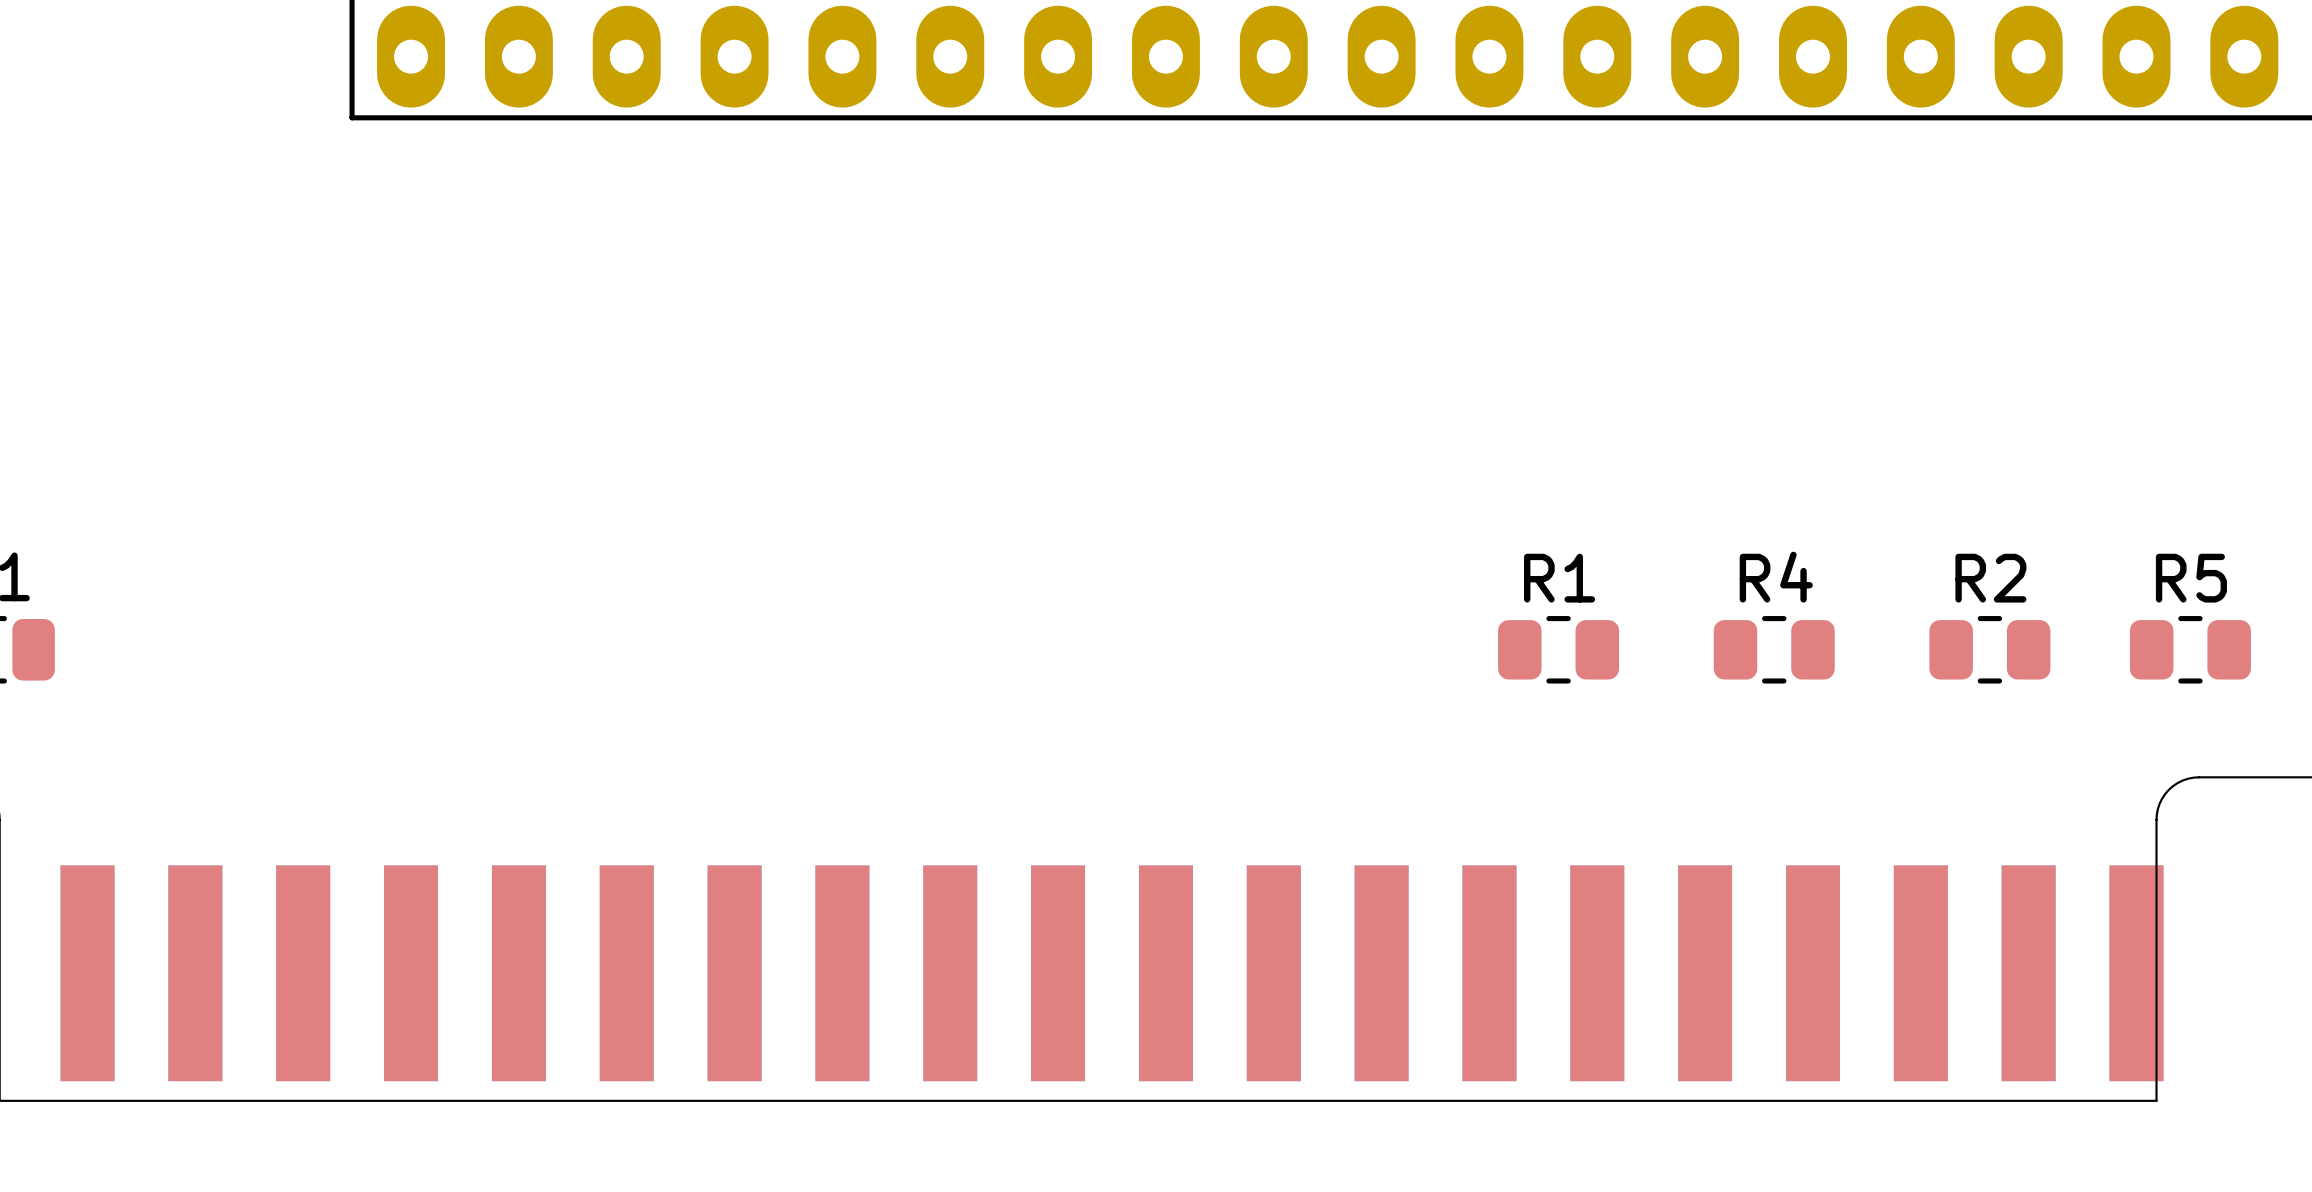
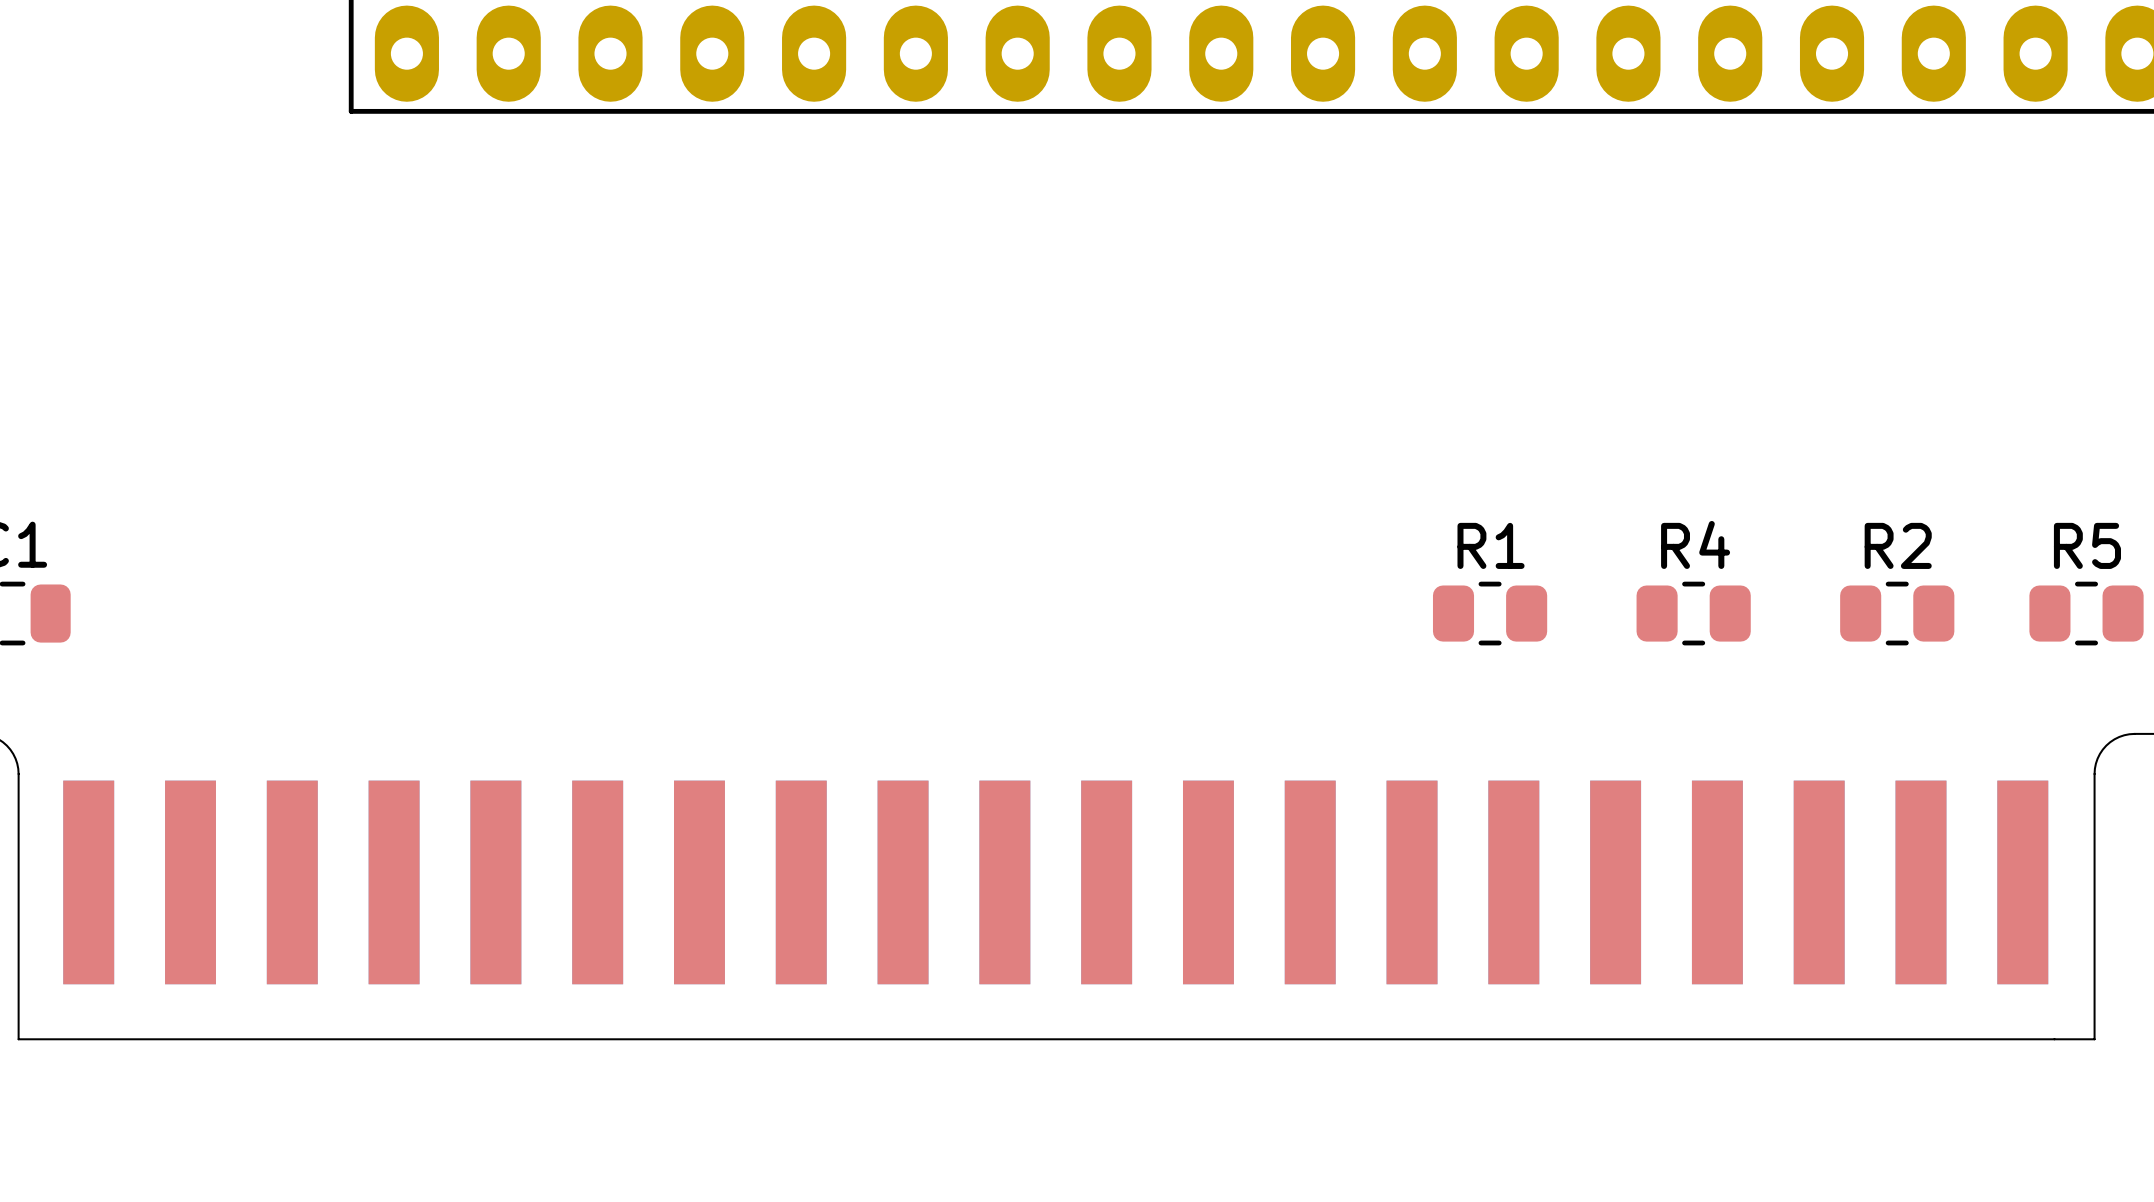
board edge: (2241, 777) (2198, 777) (2182, 780) (2165, 793) (2157, 808) (2156, 1100) -> (2134, 733) (2119, 736) (2106, 745) (2099, 753) (2094, 768) (2094, 1039) (2054, 1039)
part position: (1112, 973) -> (1055, 882)

